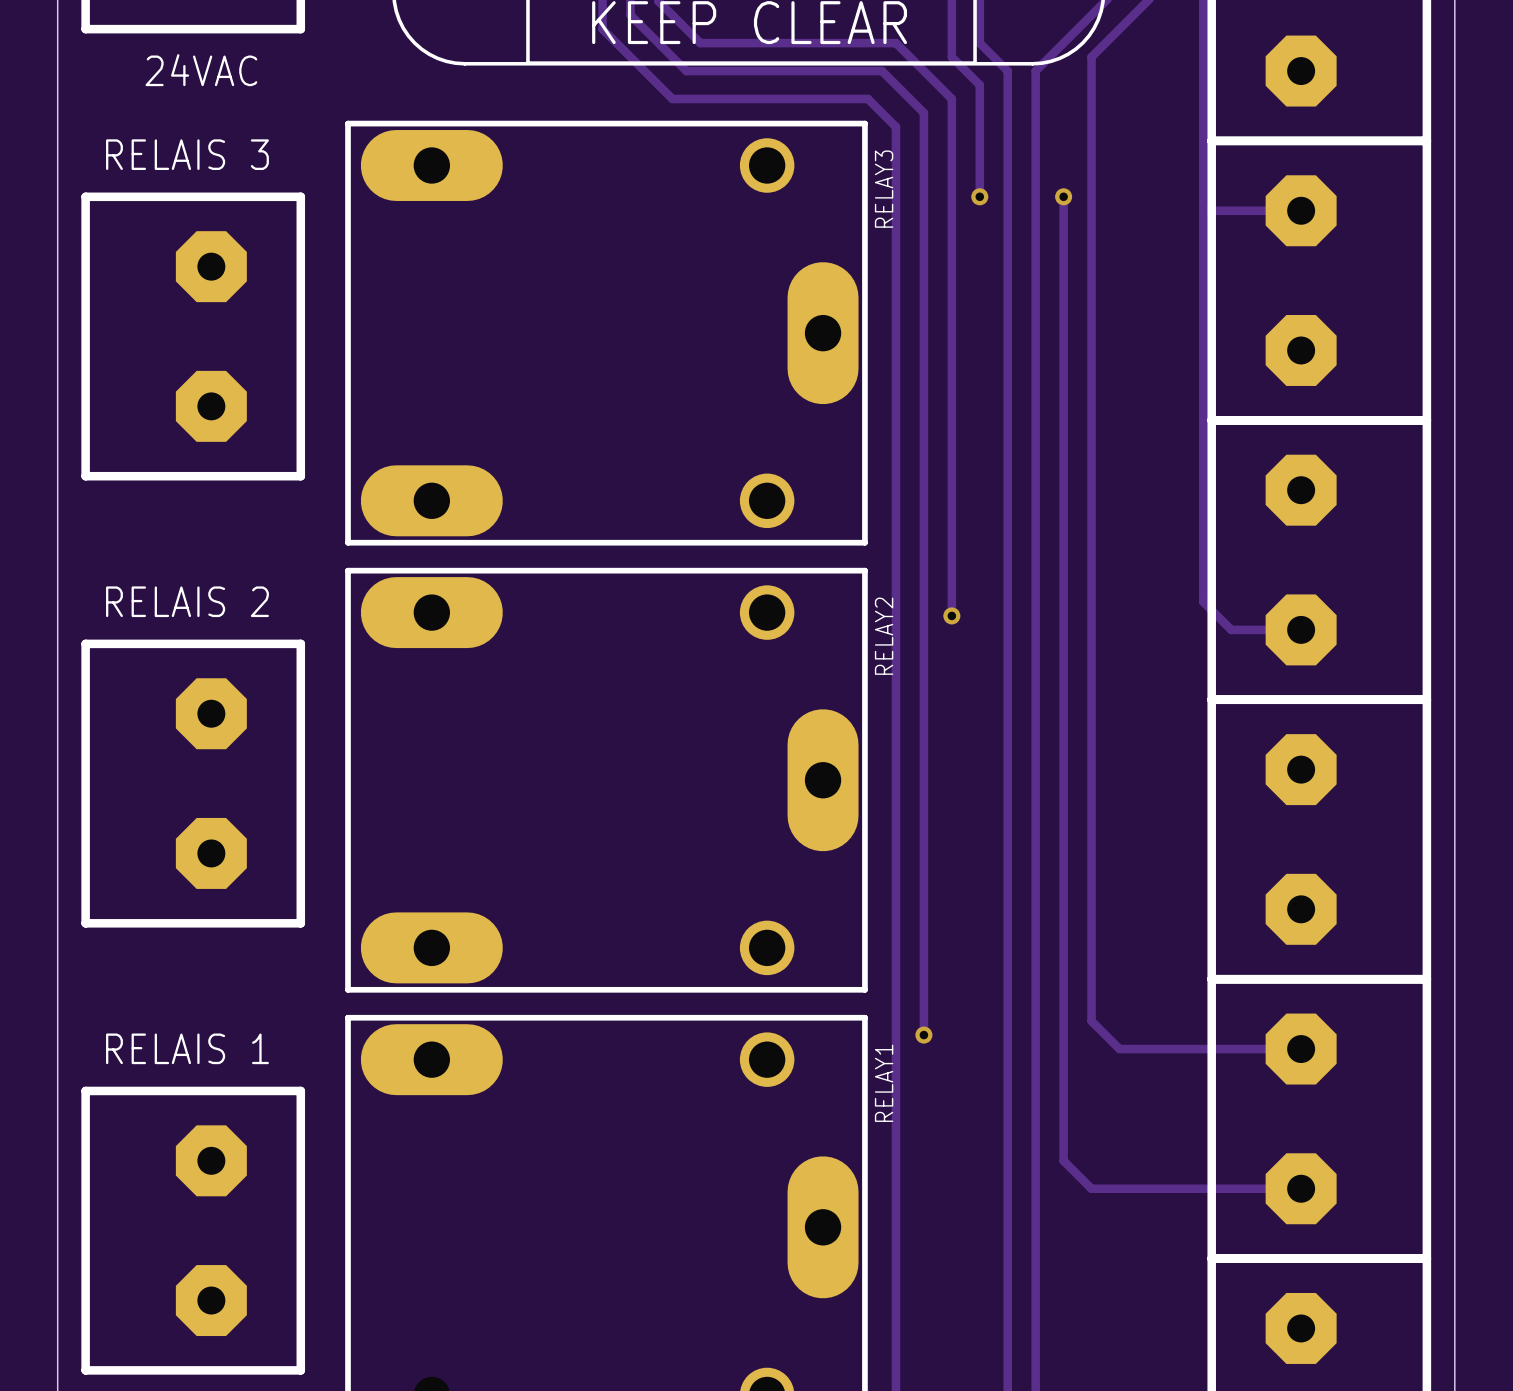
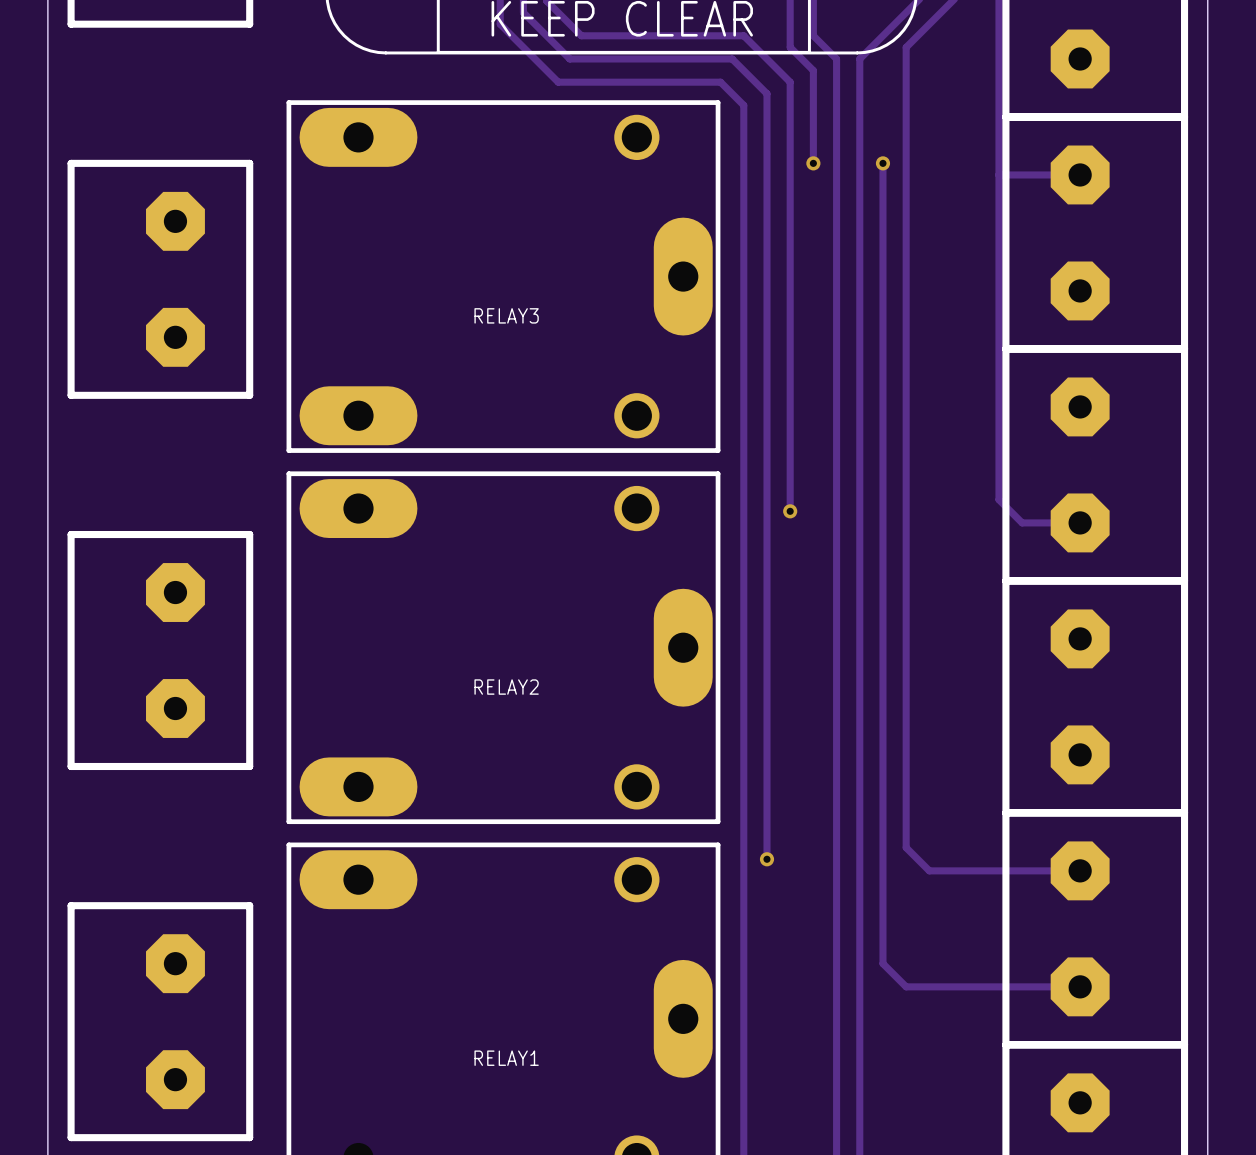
text: 24VAC (201, 70) -> none
text: RELAIS 3 (187, 154) -> none
RELAY3 name rotation: 0° (884, 189) -> 90° clockwise (506, 315)
RELAY3 name position: RELAY3 (884, 189) -> RELAY3 (506, 315)
text: RELAIS 2 (187, 601) -> none
RELAY2 name rotation: 0° (884, 636) -> 90° clockwise (506, 687)
RELAY2 name position: RELAY2 (884, 636) -> RELAY2 (506, 687)
text: RELAIS 1 (187, 1048) -> none
RELAY1 name rotation: 0° (884, 1083) -> 90° clockwise (506, 1058)
RELAY1 name position: RELAY1 (884, 1083) -> RELAY1 (506, 1058)

